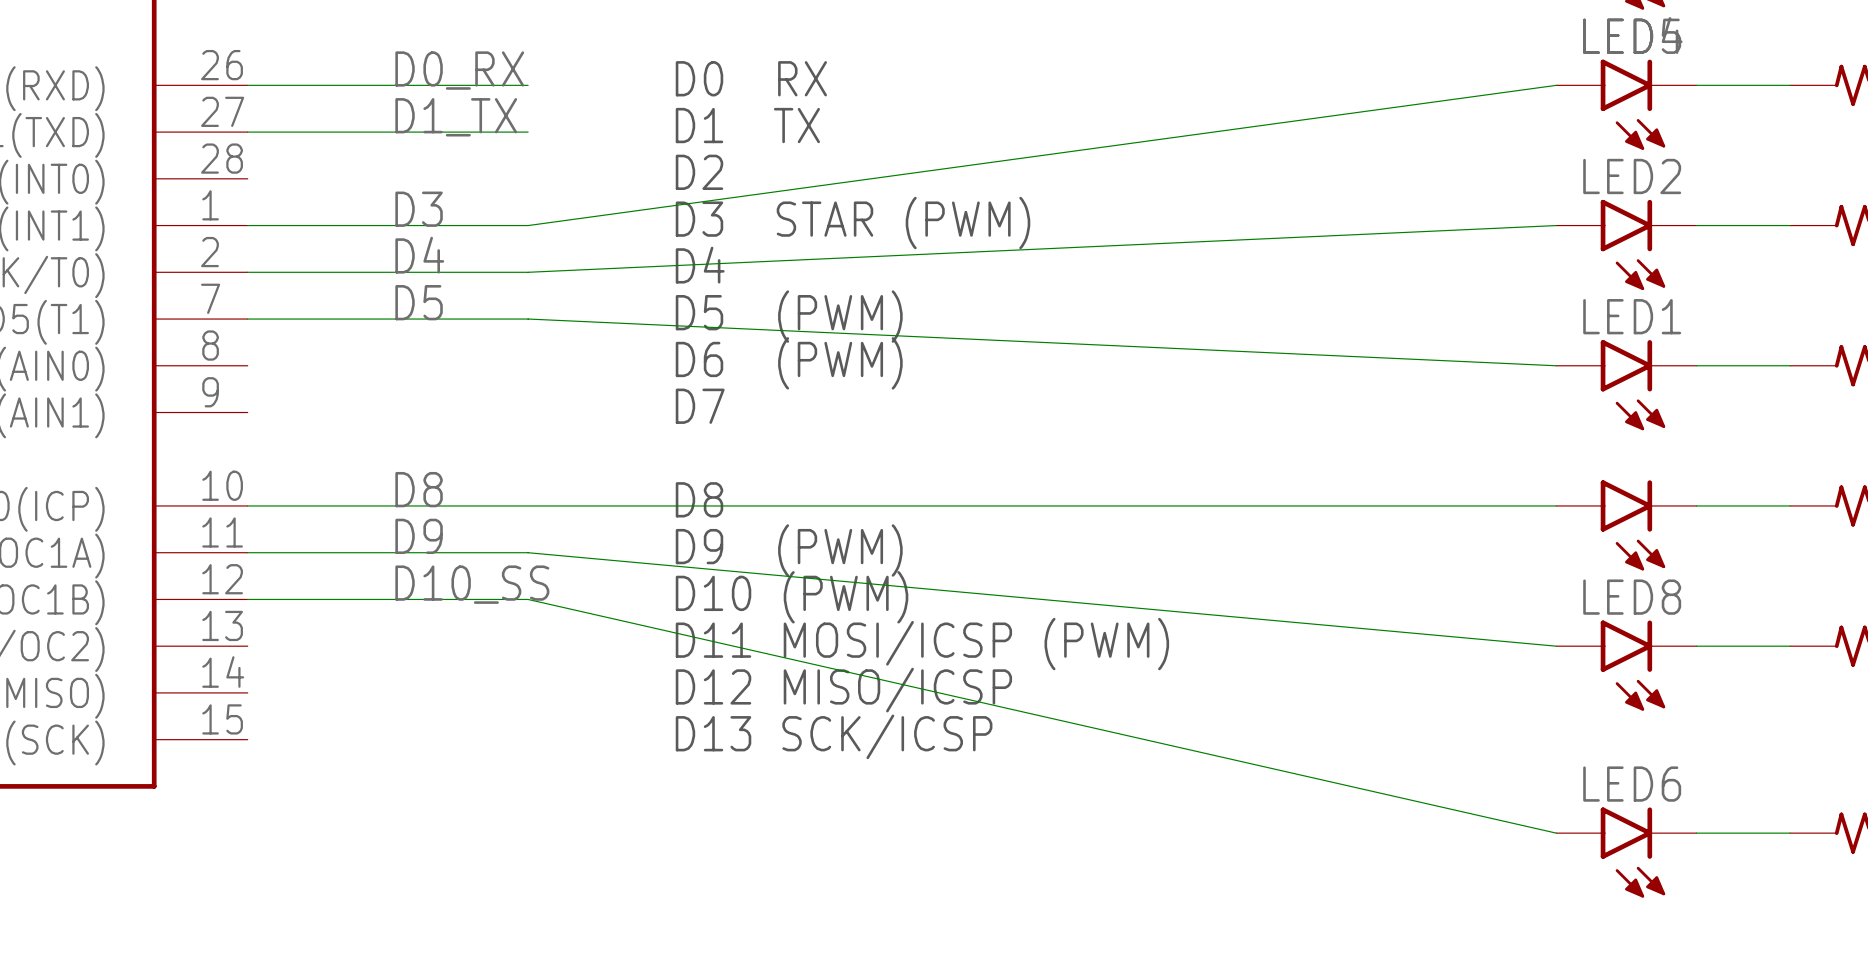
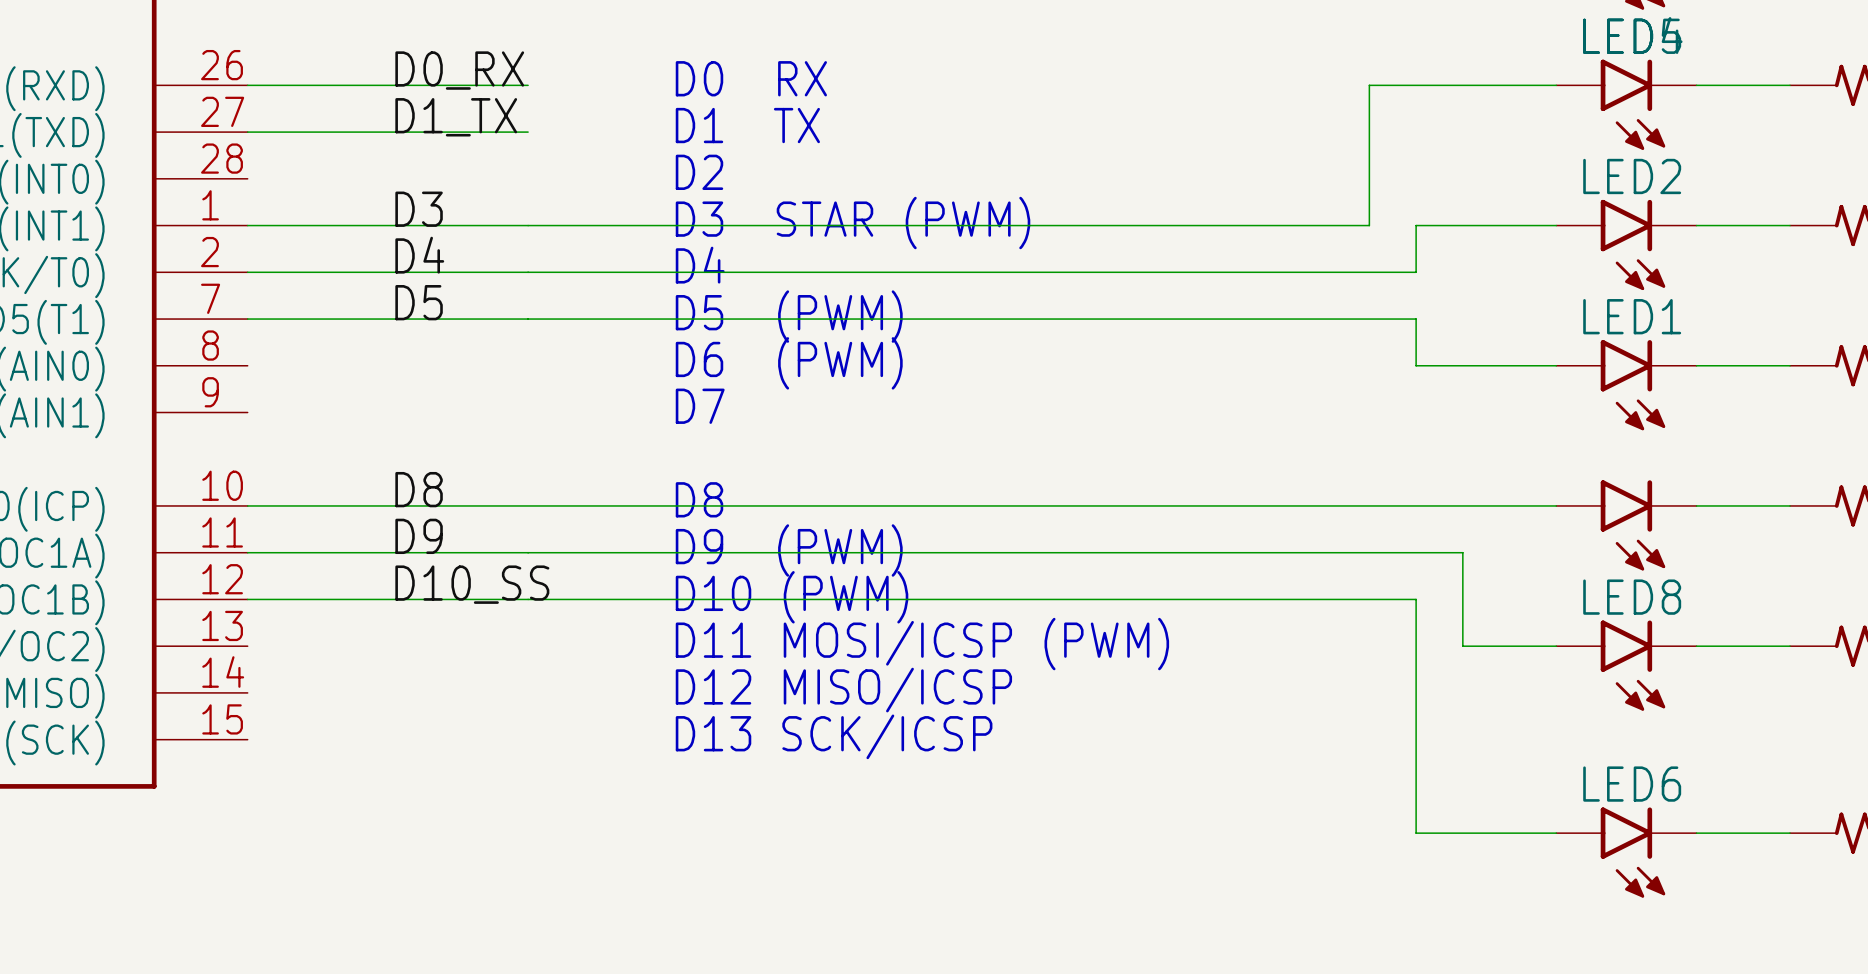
wire: (1556, 85) (528, 225) -> (1556, 85) (1369, 85) (1369, 225) (528, 225)
wire: (1556, 225) (528, 272) -> (1556, 225) (1416, 225) (1416, 272) (528, 272)
wire: (528, 319) (1556, 365) -> (528, 319) (1416, 319) (1416, 365) (1556, 365)
wire: (528, 552) (1556, 646) -> (528, 552) (1462, 552) (1462, 646) (1556, 646)
wire: (528, 599) (1556, 833) -> (528, 599) (1416, 599) (1416, 833) (1556, 833)

